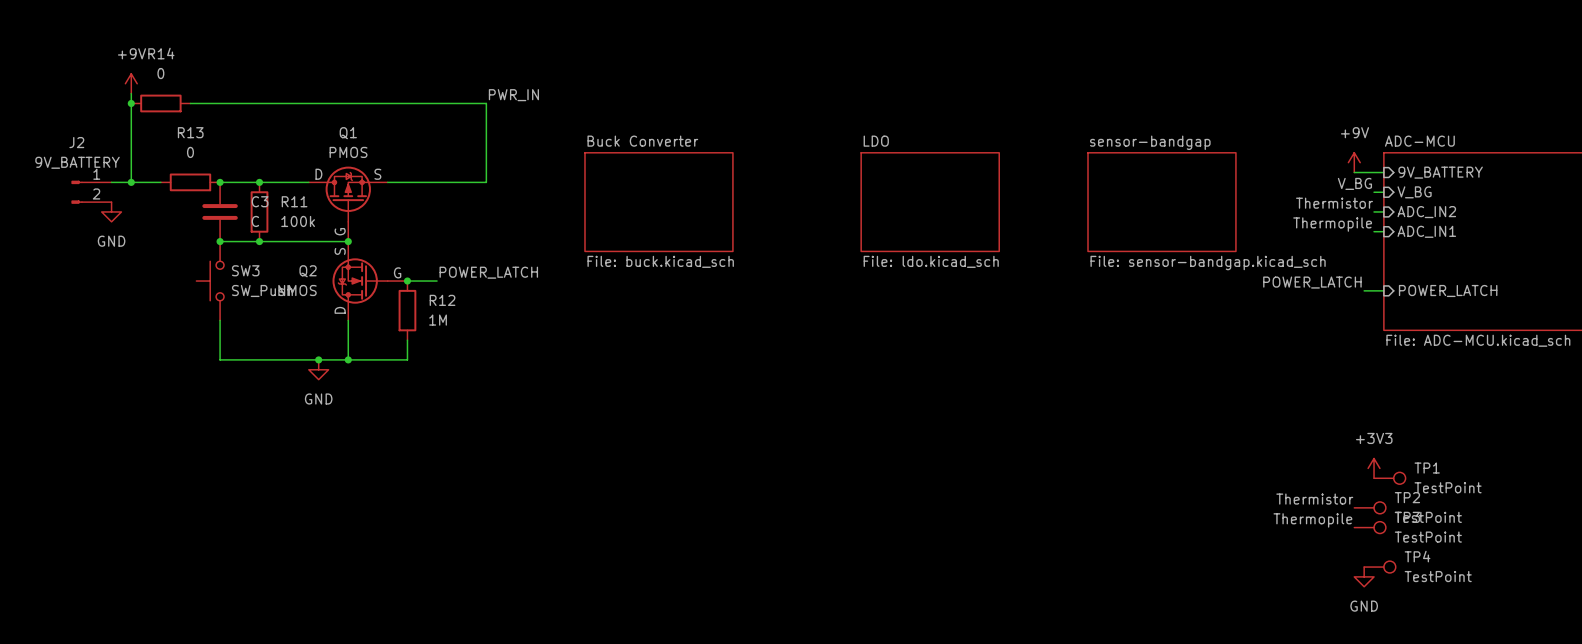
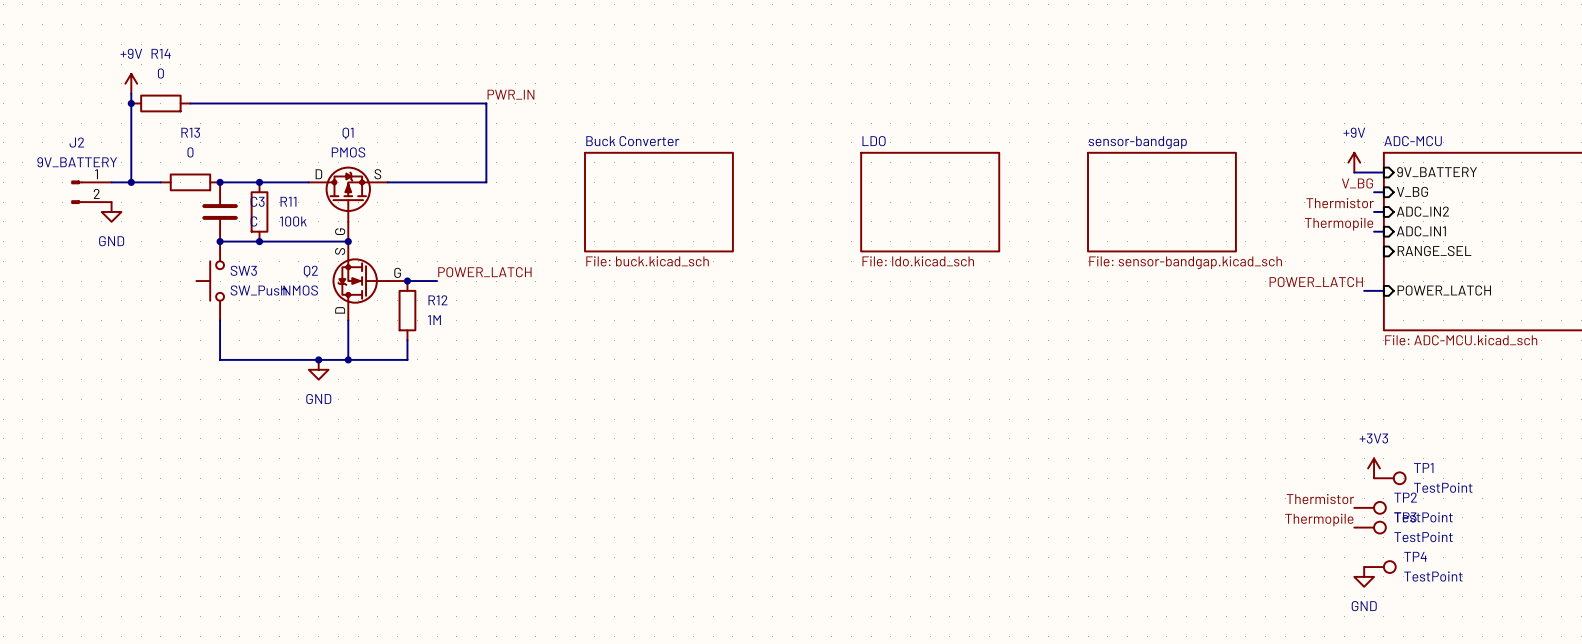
sheet pin: none -> RANGE_SEL (1434, 251)

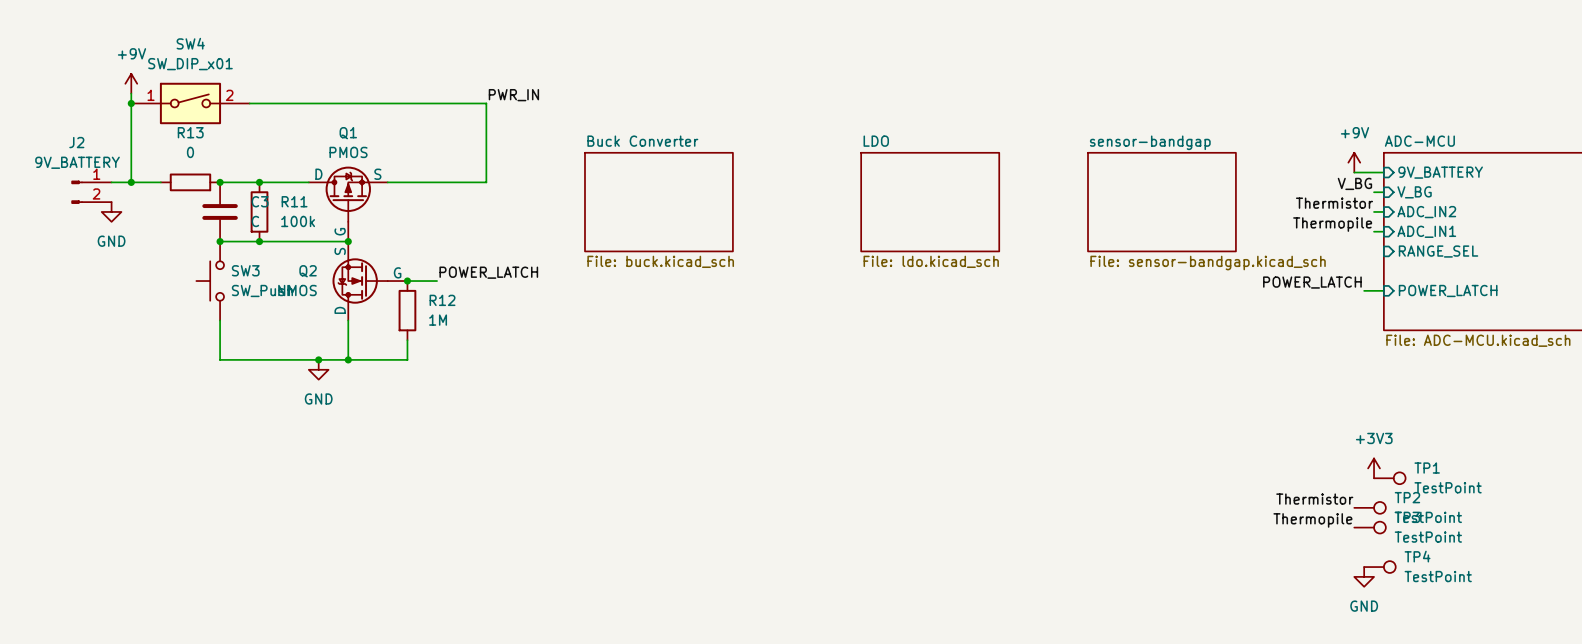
R14: 0 (160, 103) -> none
SW4: none -> SW_DIP_x01 (190, 103)

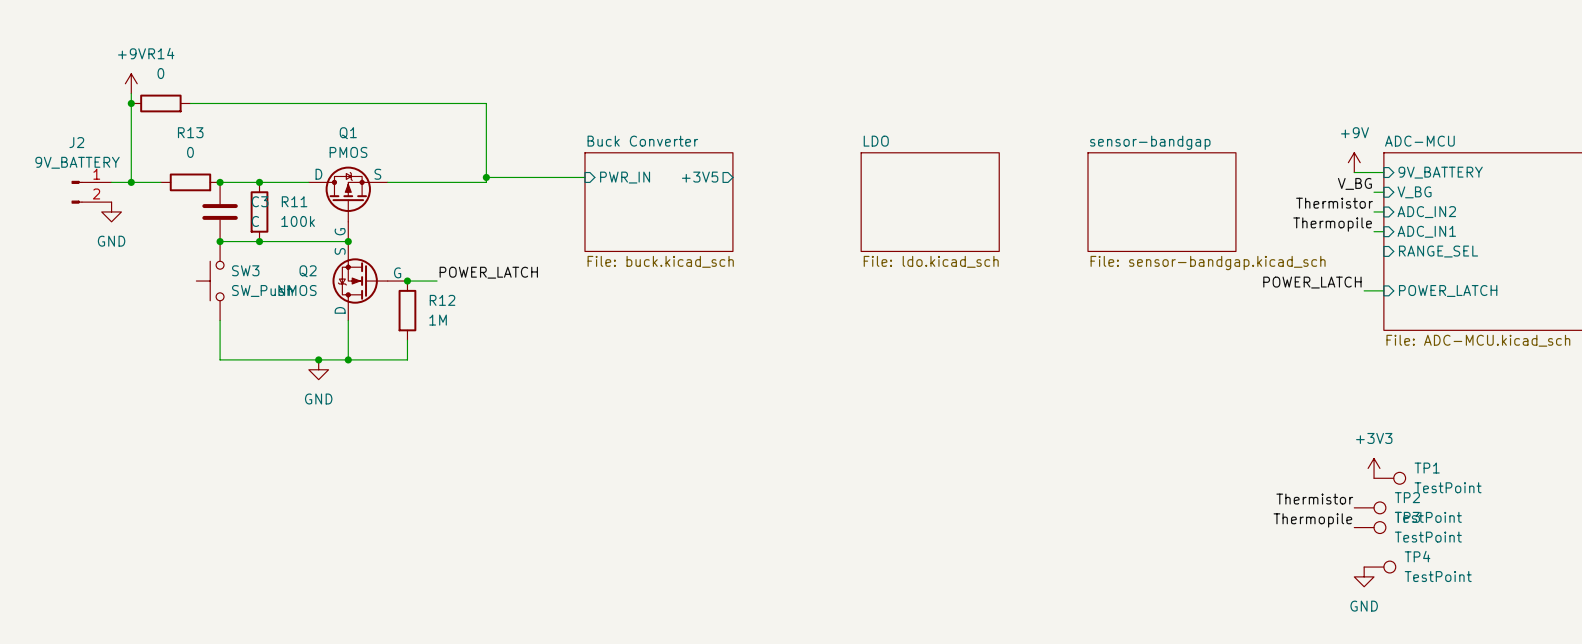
label: PWR_IN (513, 95) -> none
R14: none -> 0 (160, 103)
SW4: SW_DIP_x01 (190, 103) -> none
wire: none -> (486, 177) (584, 177)
junction: none -> (486, 177)
sheet pin: none -> PWR_IN (625, 177)
sheet pin: none -> +3V5 (700, 177)

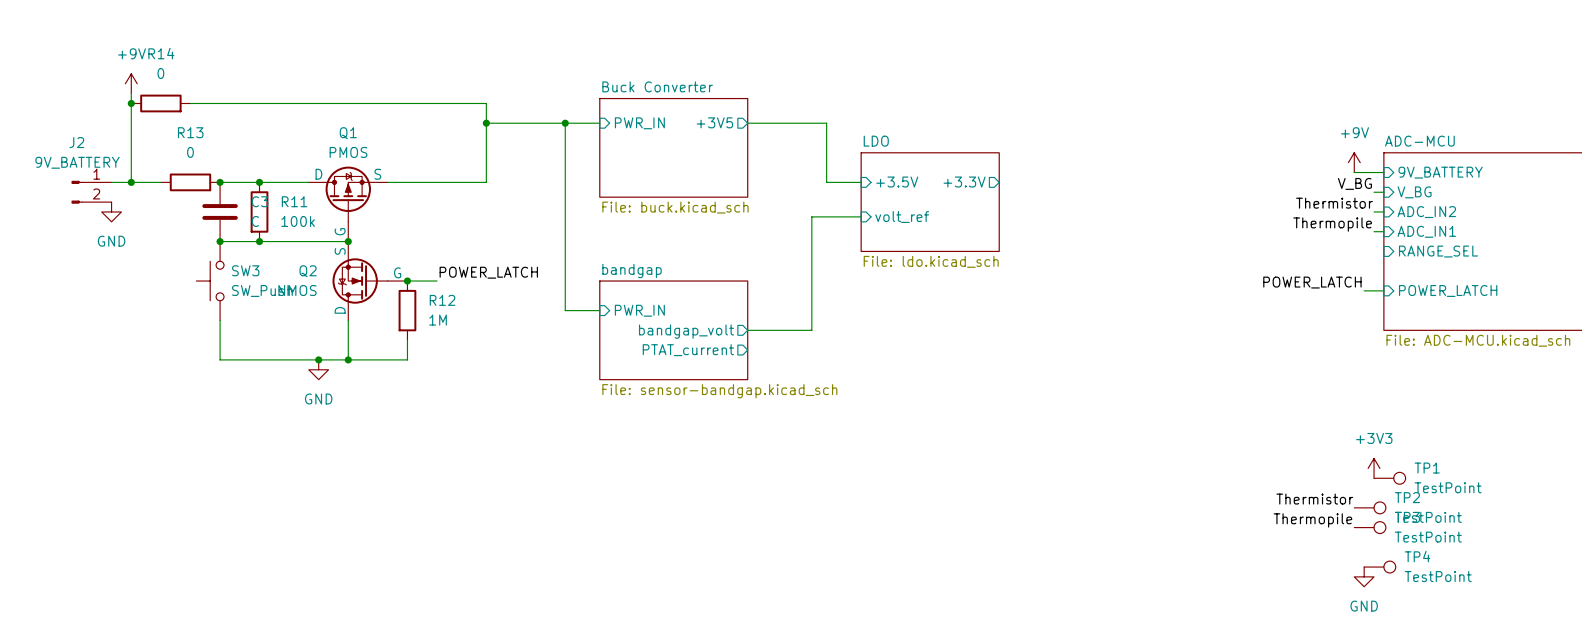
wire: none -> (486, 123) (599, 123)
junction: none -> (486, 123)
wire: none -> (565, 123) (565, 310) (599, 310)
junction: none -> (565, 123)
wire: none -> (747, 123) (826, 123) (826, 182) (861, 182)
wire: (486, 177) (584, 177) -> none
junction: (486, 177) -> none
sheet pin position: PWR_IN (625, 177) -> PWR_IN (639, 123)
sheet pin position: +3V5 (700, 177) -> +3V5 (714, 122)
sheet pin: none -> +3.5V (897, 182)
sheet pin: none -> +3.3V (964, 182)
sheet Buck Converter position: (658, 202) -> (673, 147)
sheet sensor-bandgap: File: sensor-bandgap.kicad_sch (1161, 202) -> none
wire: none -> (861, 216) (811, 216) (811, 330) (747, 330)
sheet pin: none -> volt_ref (902, 217)
sheet pin: none -> PWR_IN (639, 310)
sheet bandgap: none -> File: sensor-bandgap.kicad_sch (673, 330)
sheet pin: none -> bandgap_volt (686, 331)
sheet pin: none -> PTAT_current (688, 350)

